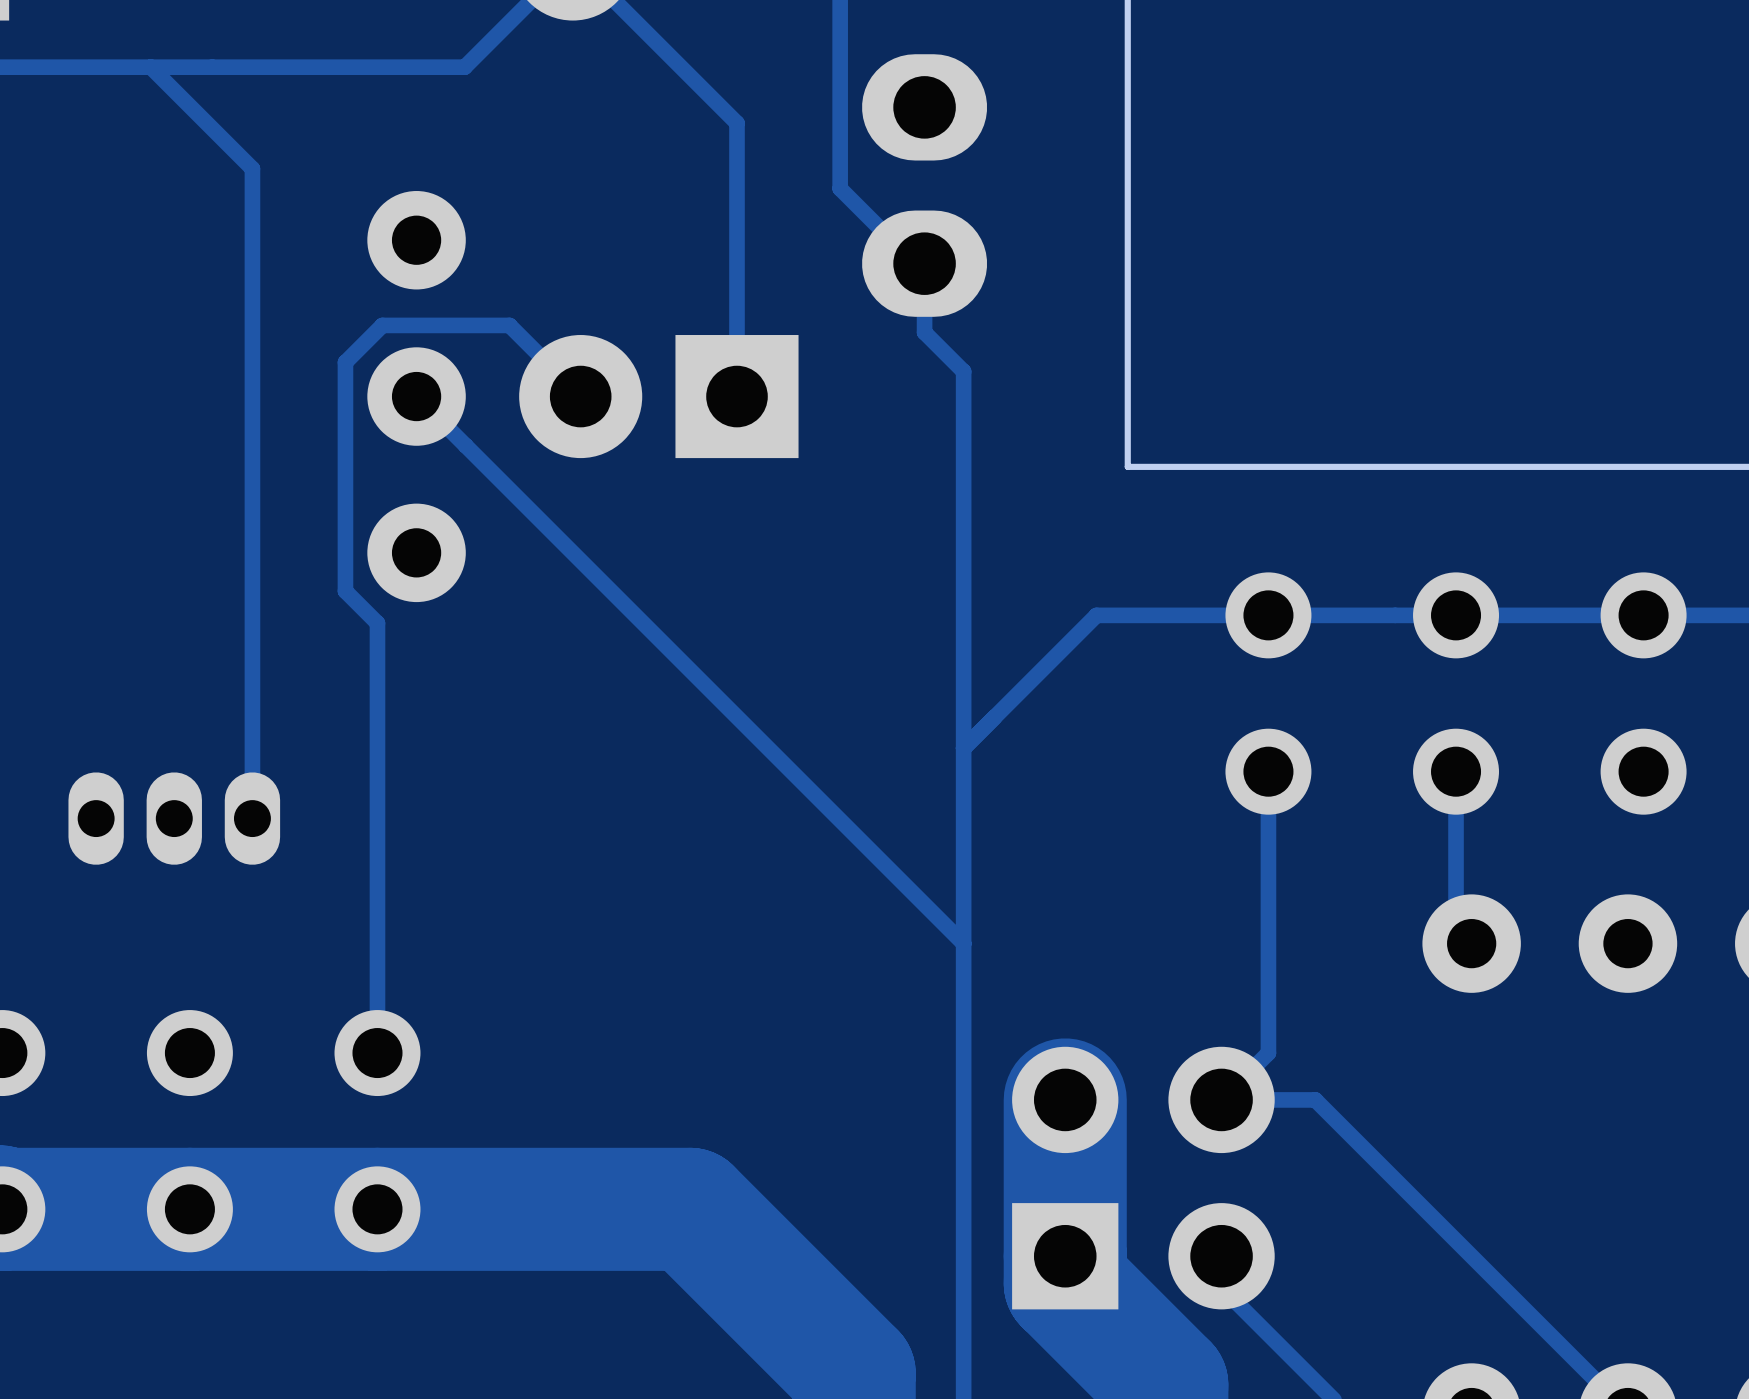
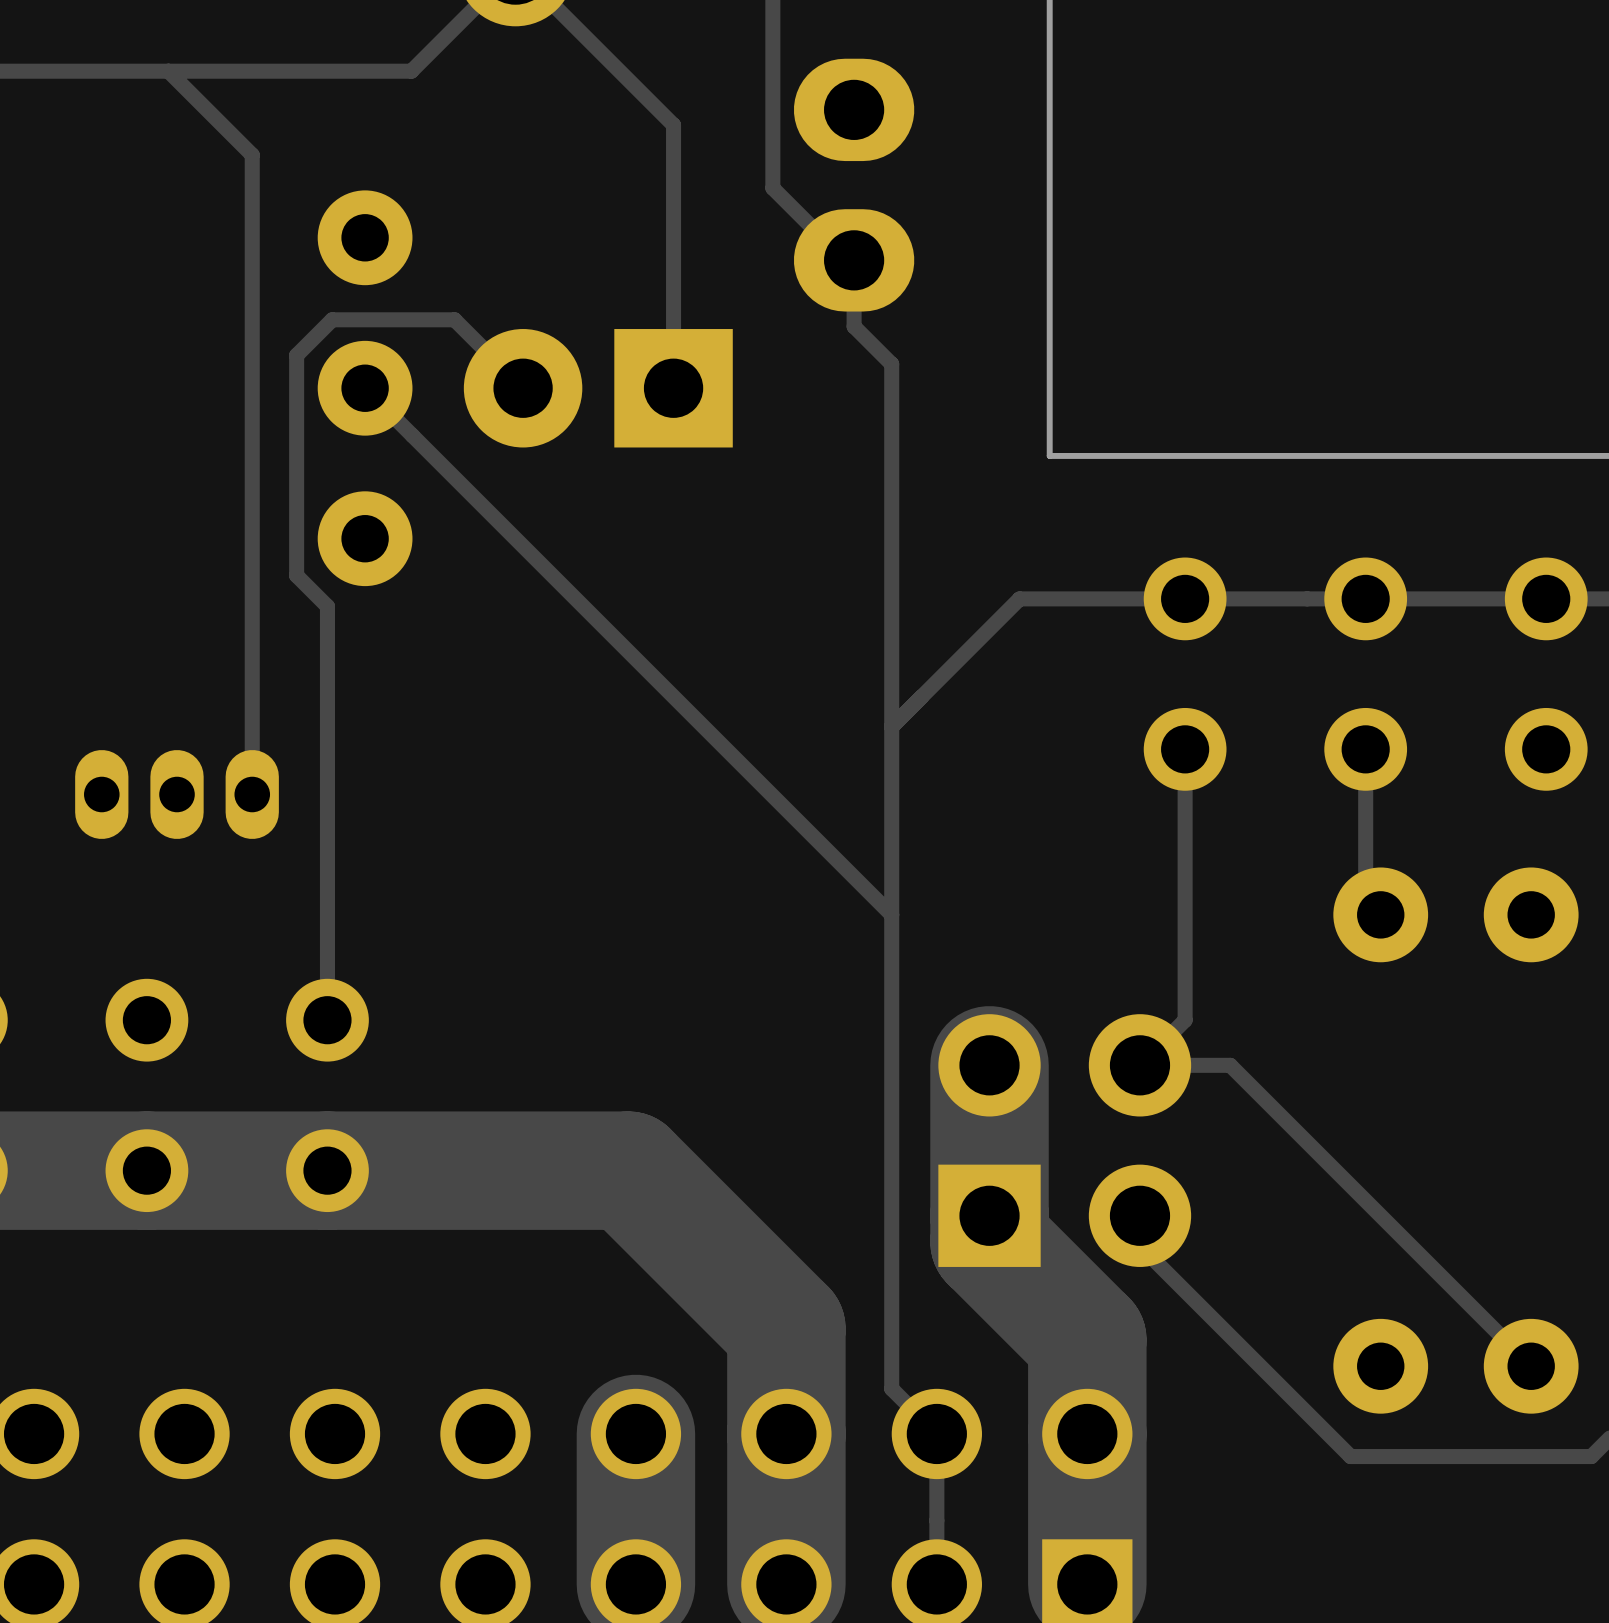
track: (150, 67) (252, 168) (252, 818) -> none
track: none -> (168, 71) (252, 155) (252, 794)
part position: (174, 818) -> (177, 794)

